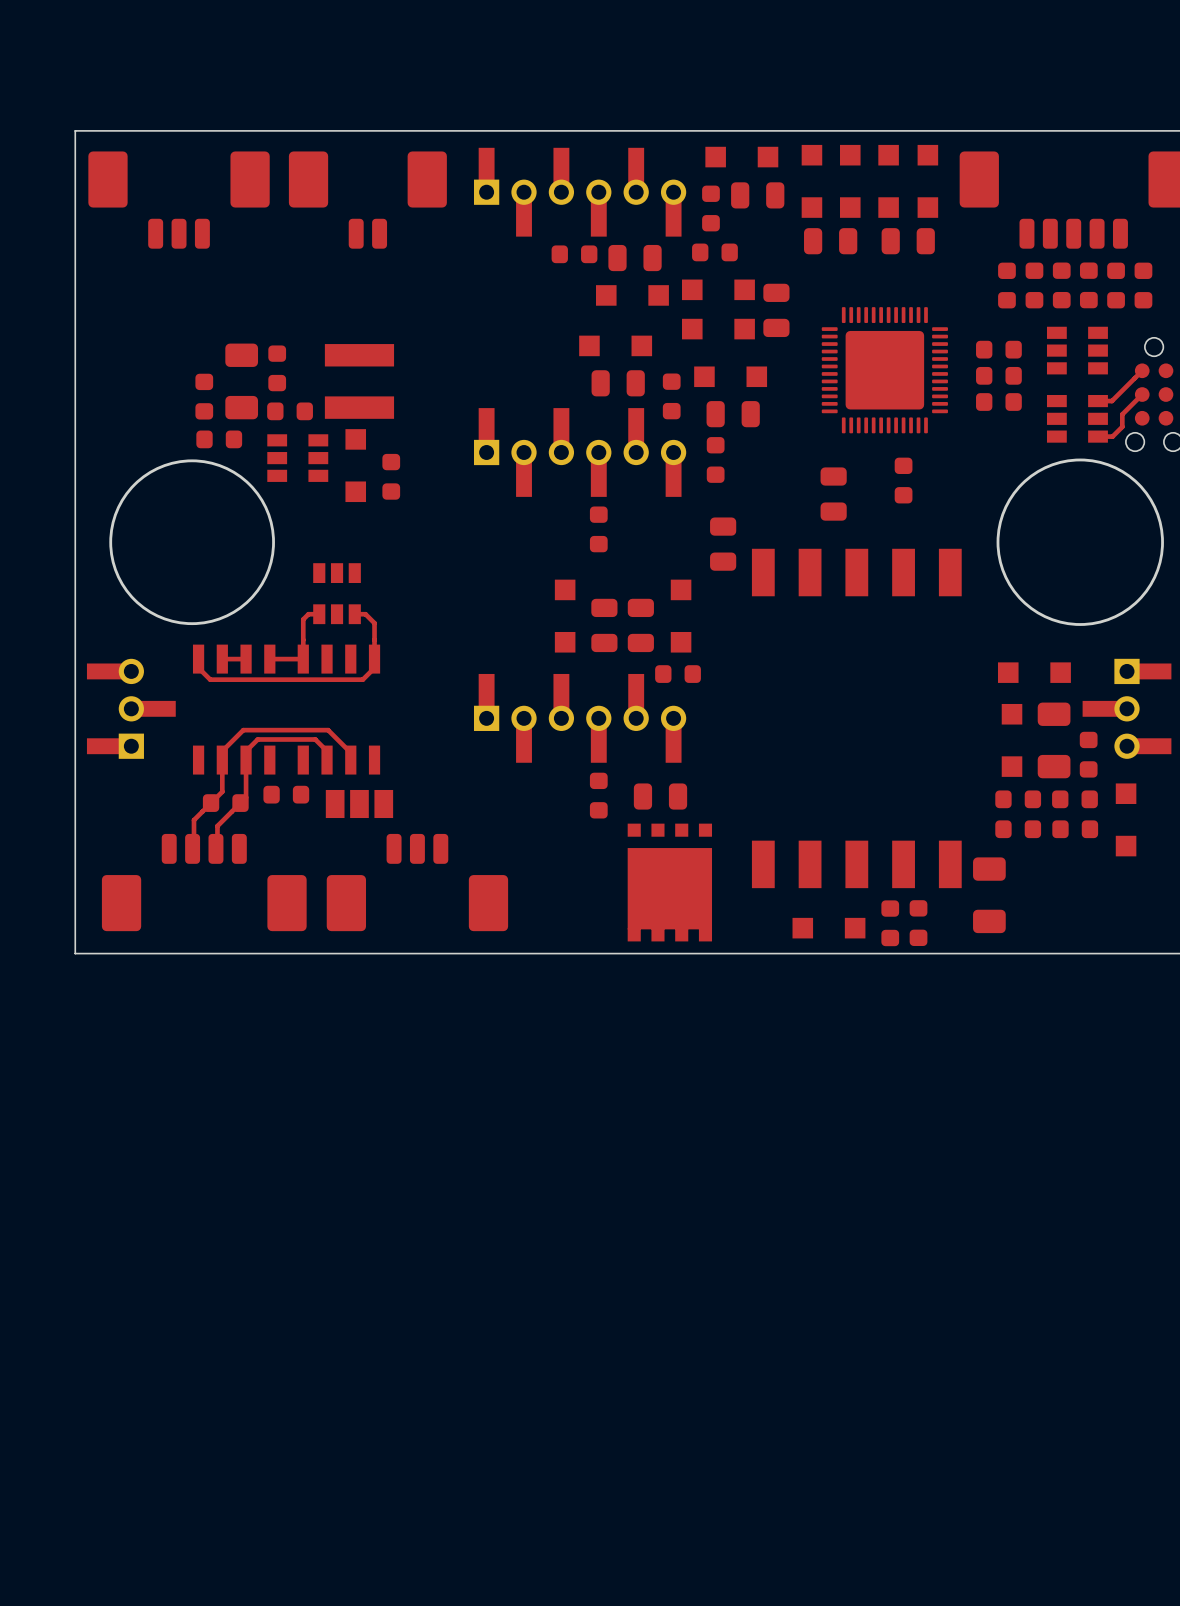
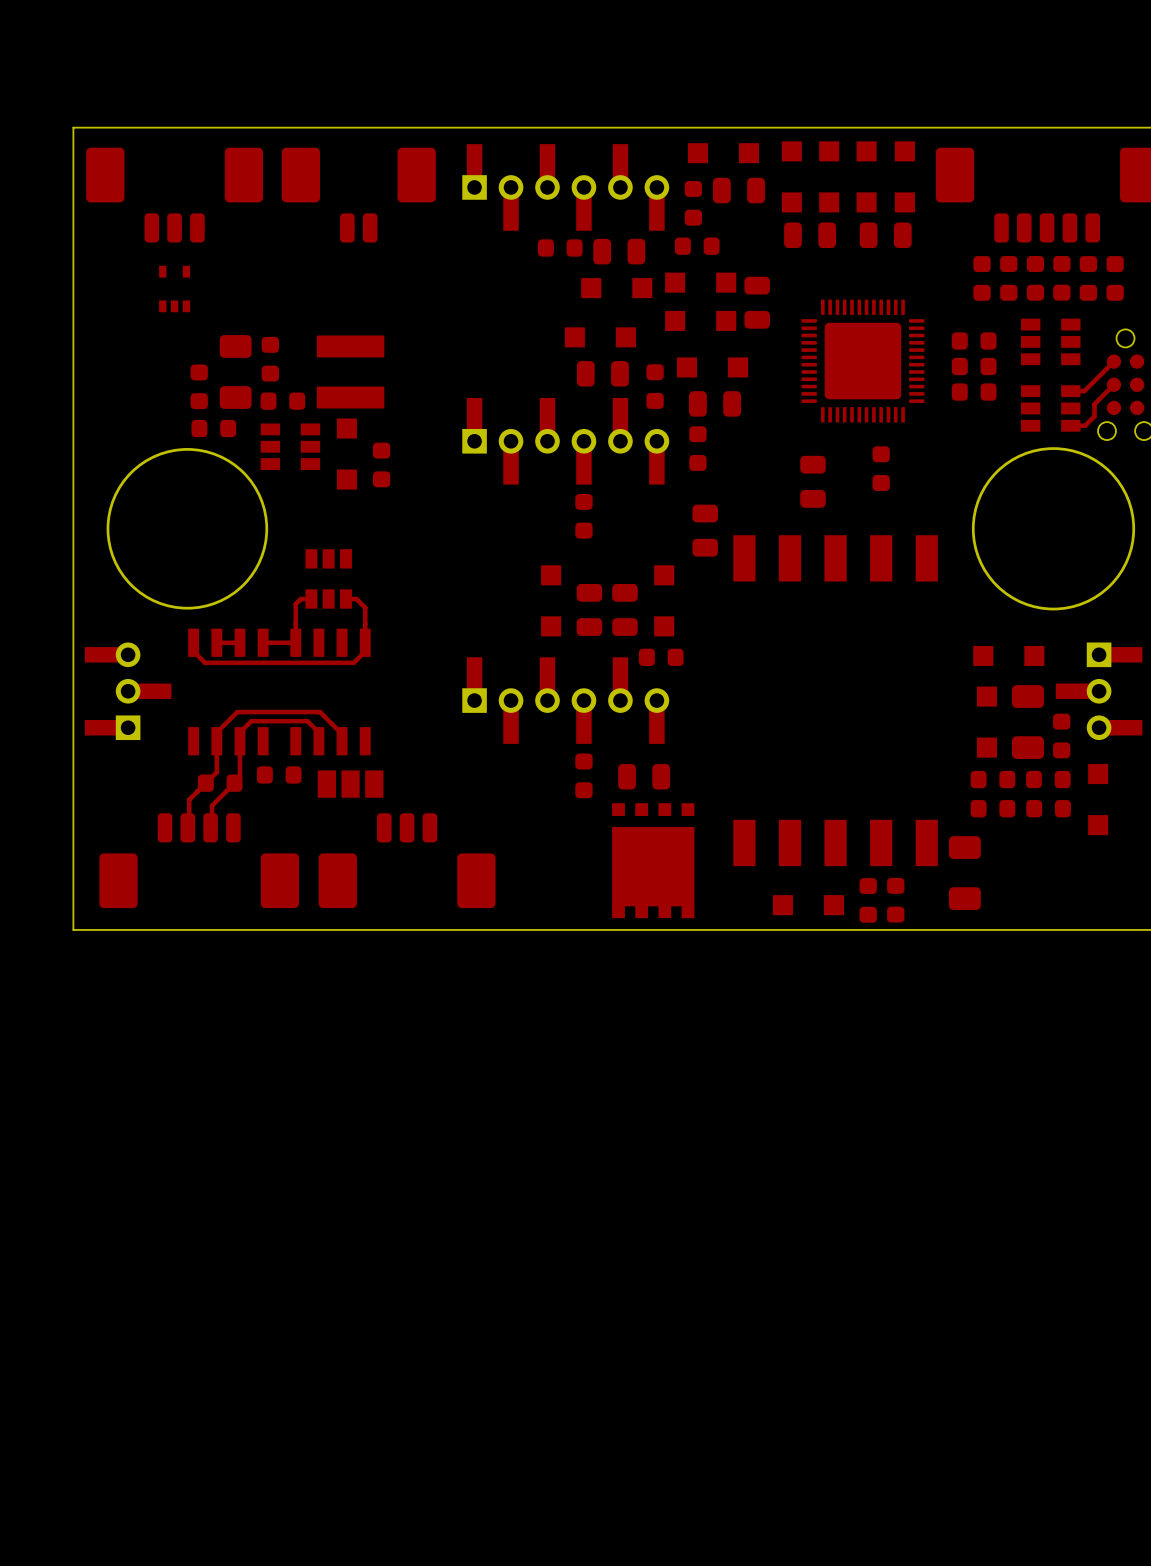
part: none -> (174, 289)

